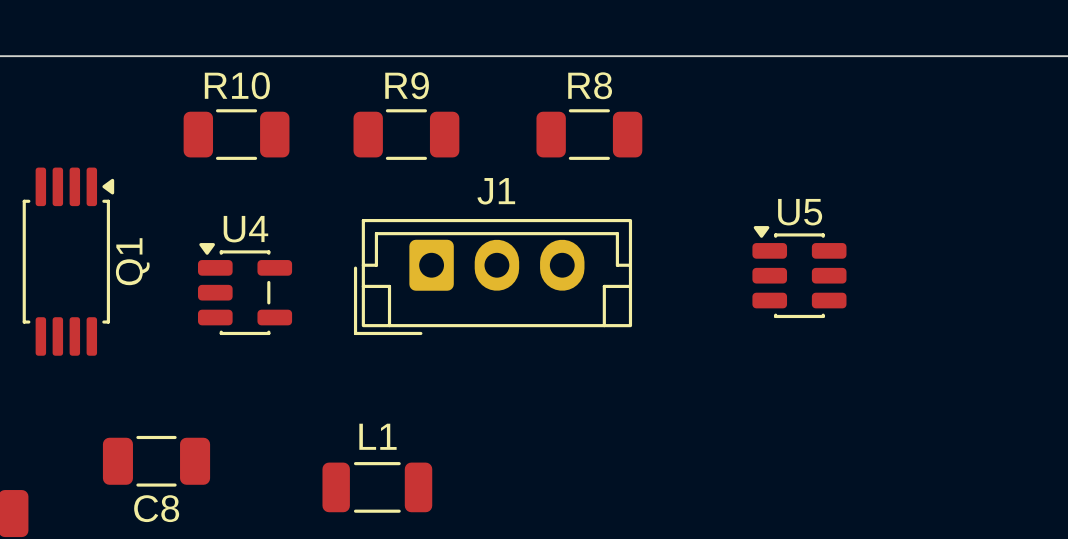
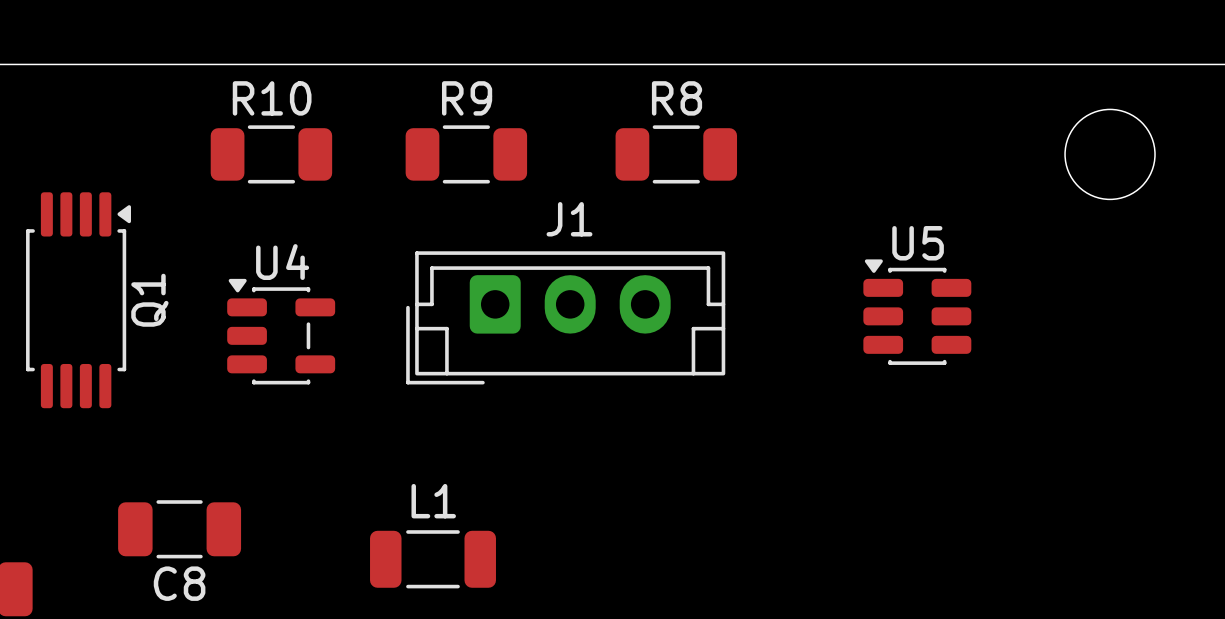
round board edge: none -> [1064, 108, 1156, 201]

